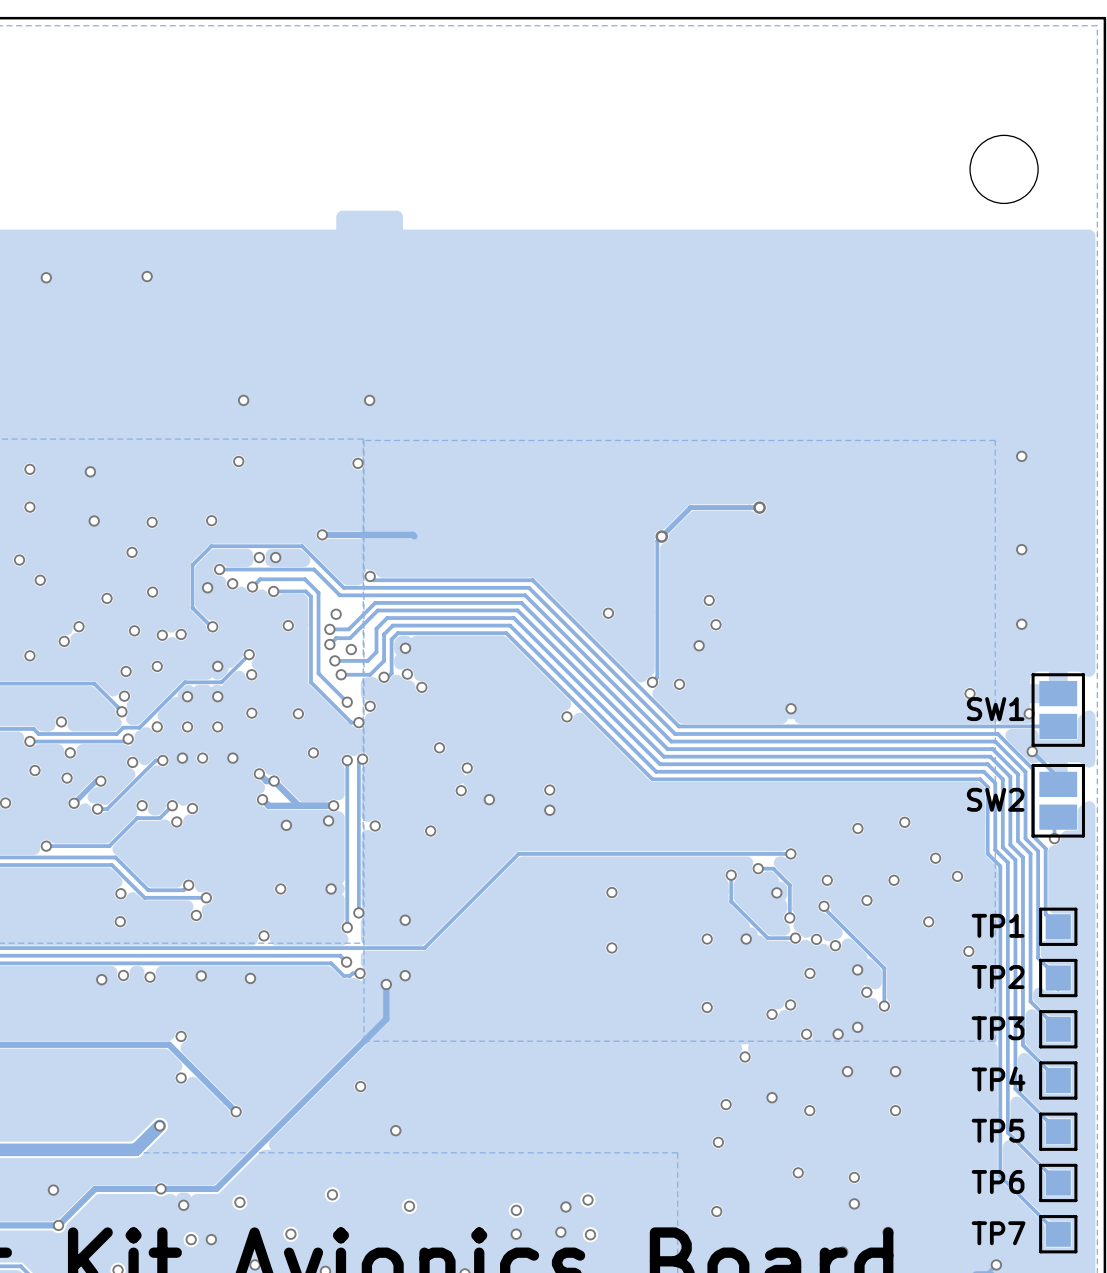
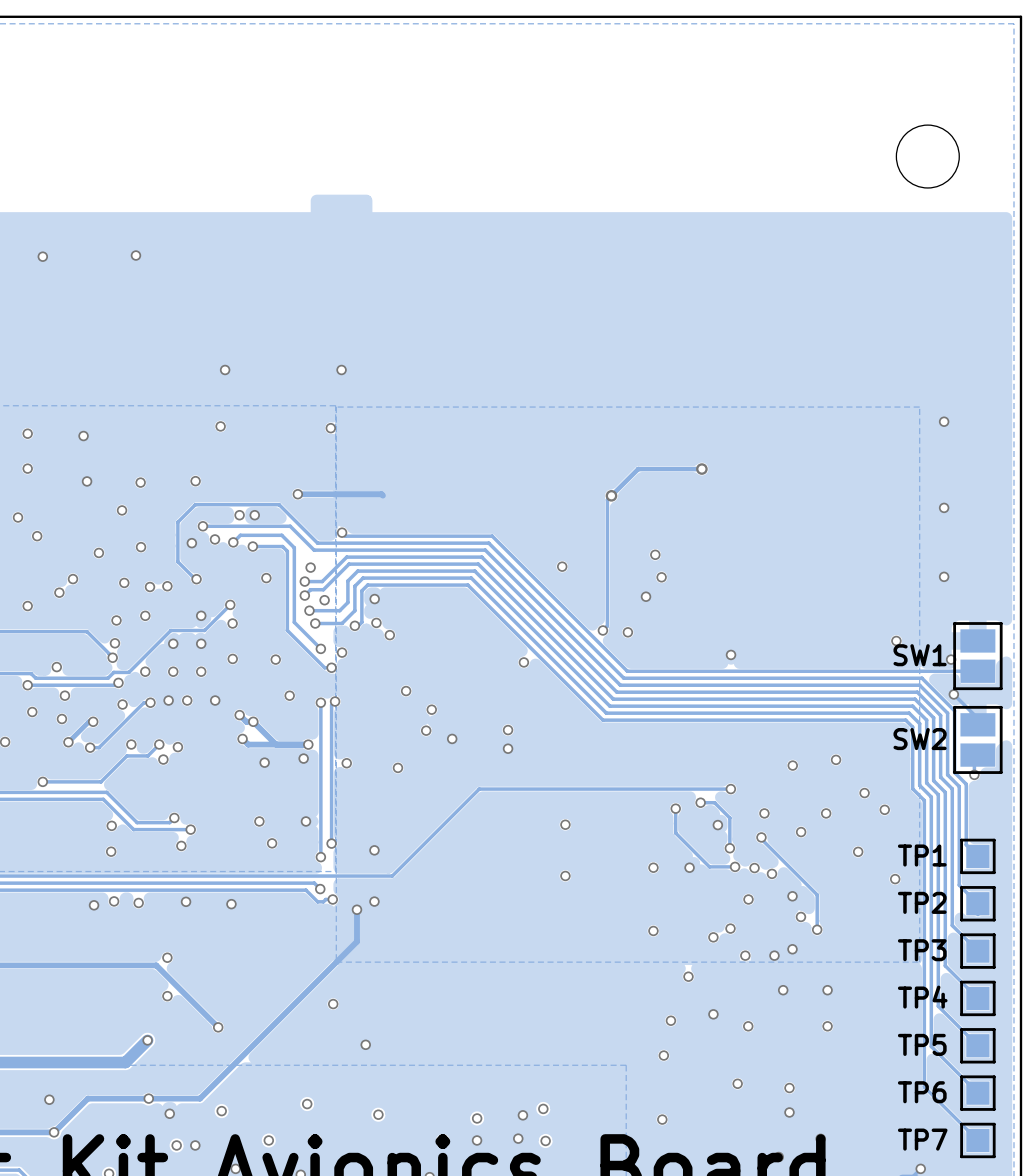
via position: (264, 935) -> (272, 843)

